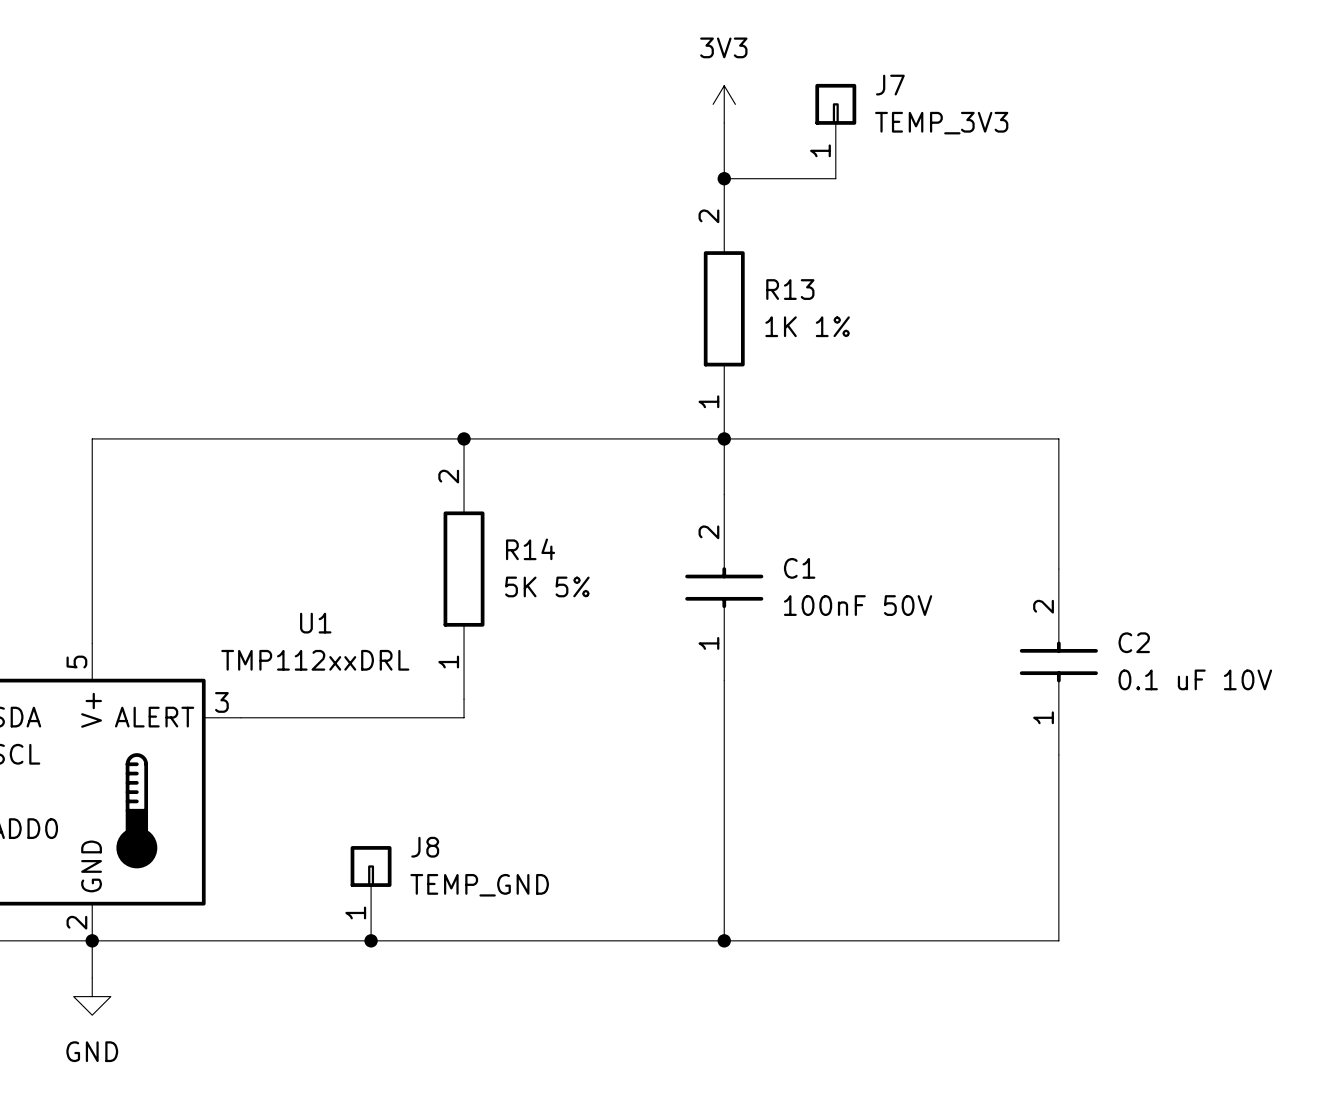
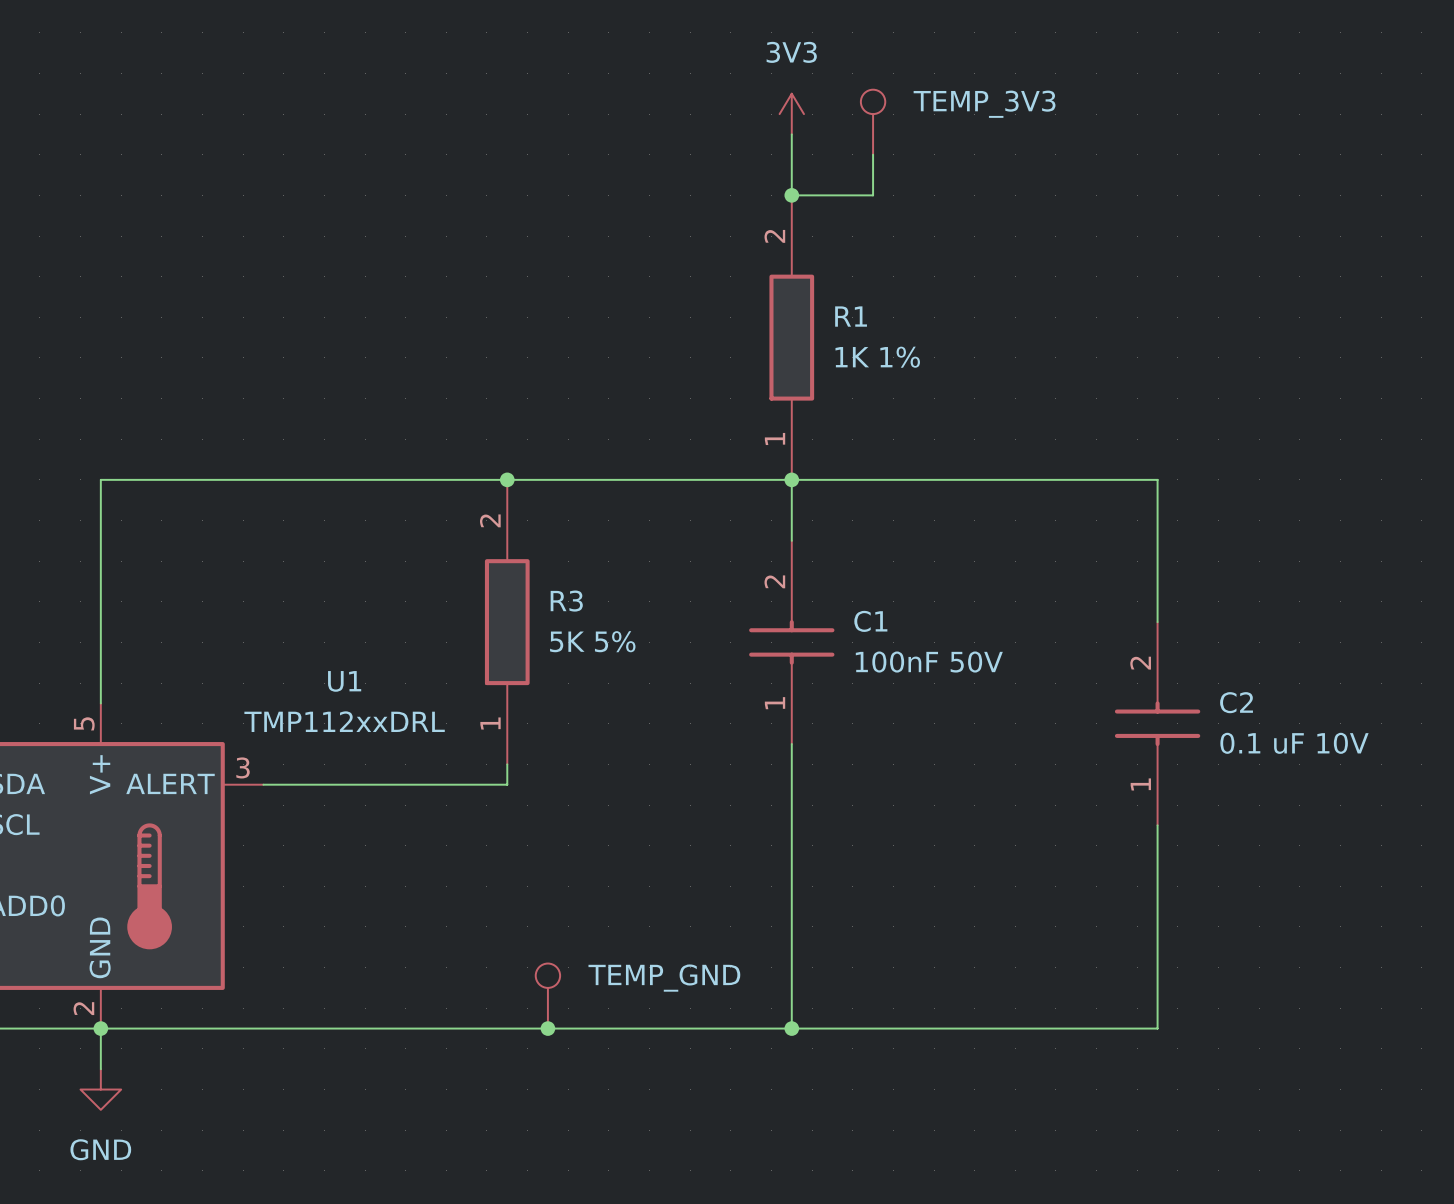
TEMP_3V3: none -> (873, 122)
J7: TEMP_3V3 (835, 131) -> none
wire: (798, 178) (835, 178) -> (873, 195) (873, 154)
R13 name: R13 (790, 289) -> R1 (851, 316)
R14 name: R14 (530, 549) -> R3 (566, 601)
J8: TEMP_GND (371, 893) -> none
TEMP_GND: none -> (547, 996)
junction: (371, 940) -> none
junction: none -> (547, 1028)

